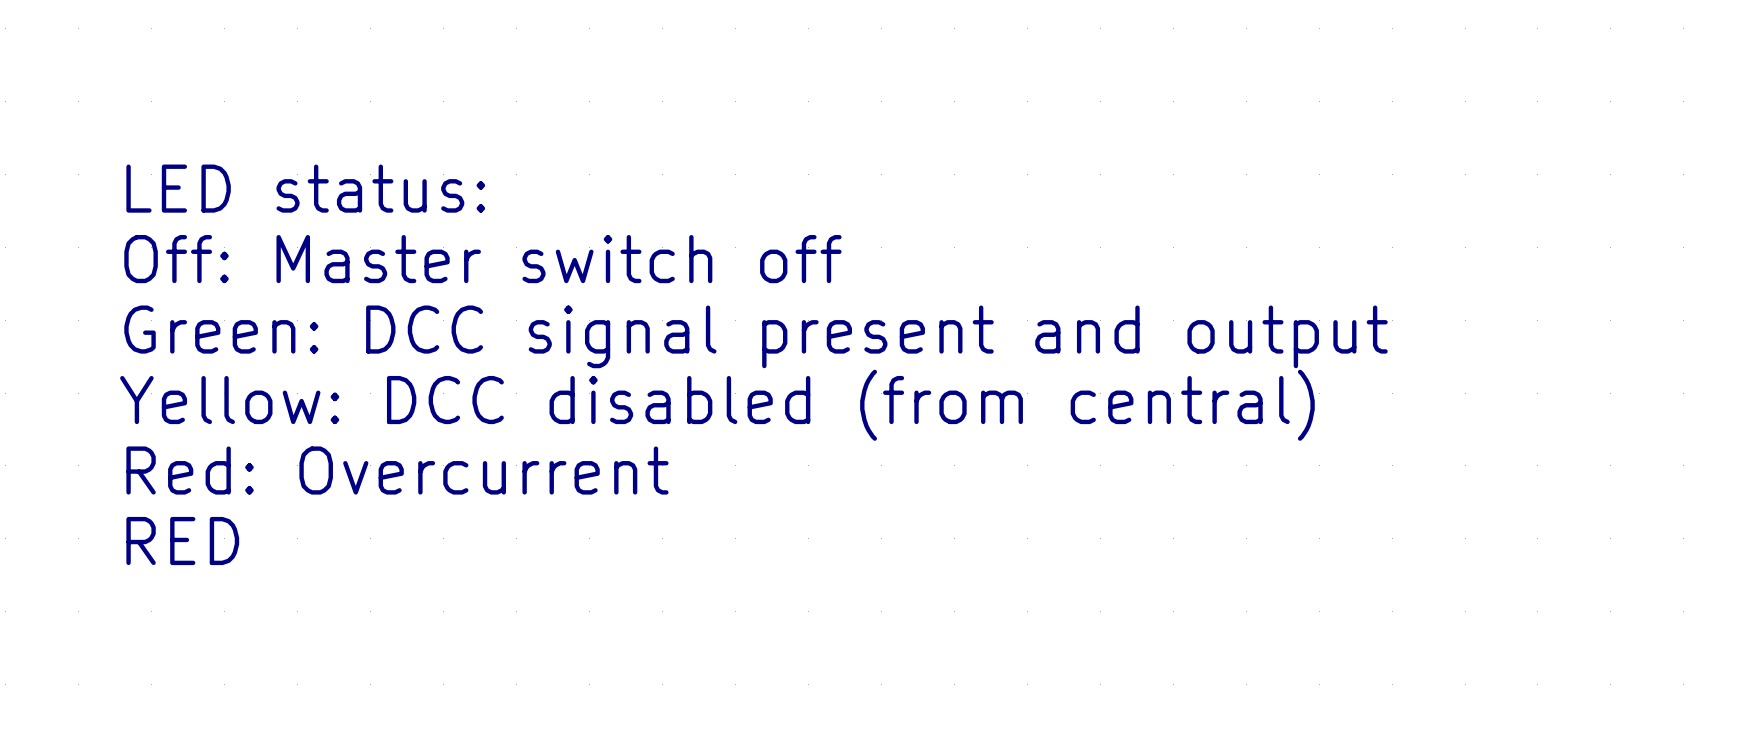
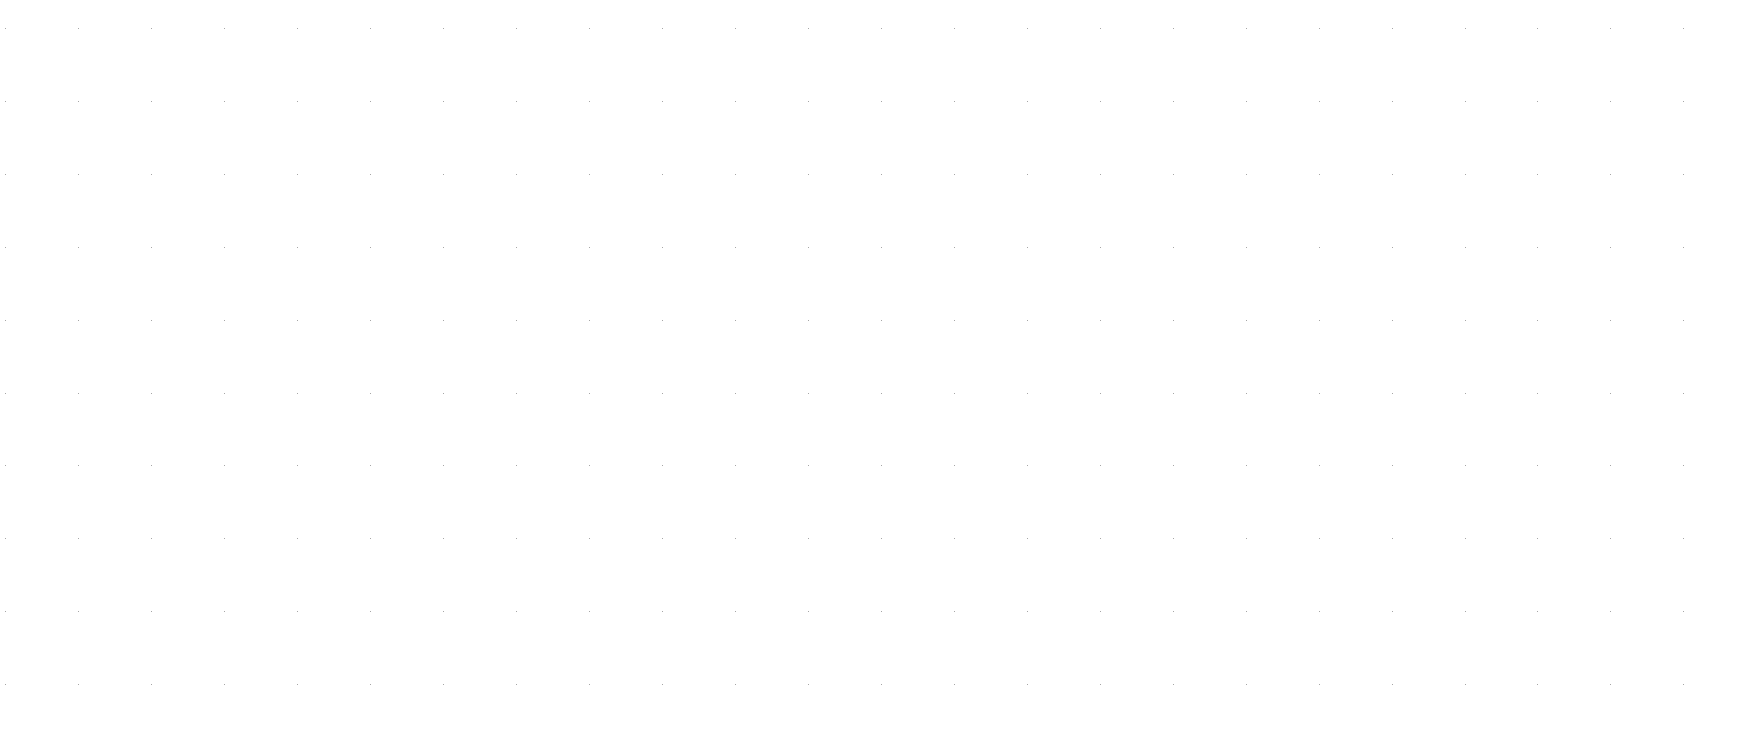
text: LED status: (305, 188) -> none
text: Off: Master switch off (482, 259) -> none
text: Green: DCC signal present and output (756, 336) -> none
text: Yellow: DCC disabled (from central) (717, 405) -> none
text: Red: Overcurrent (397, 470) -> none
text: RED (182, 540) -> none

